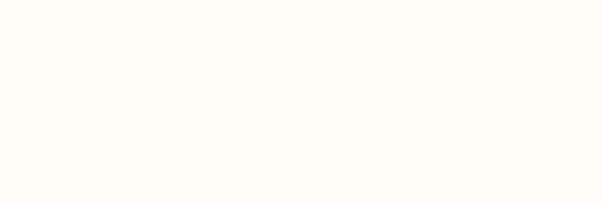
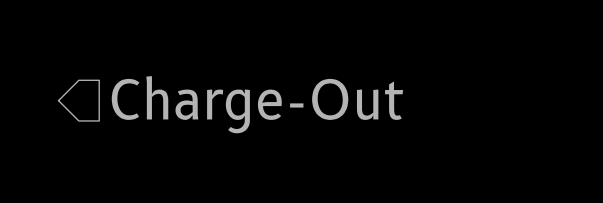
hierarchical label: none -> Charge-Out (257, 104)

